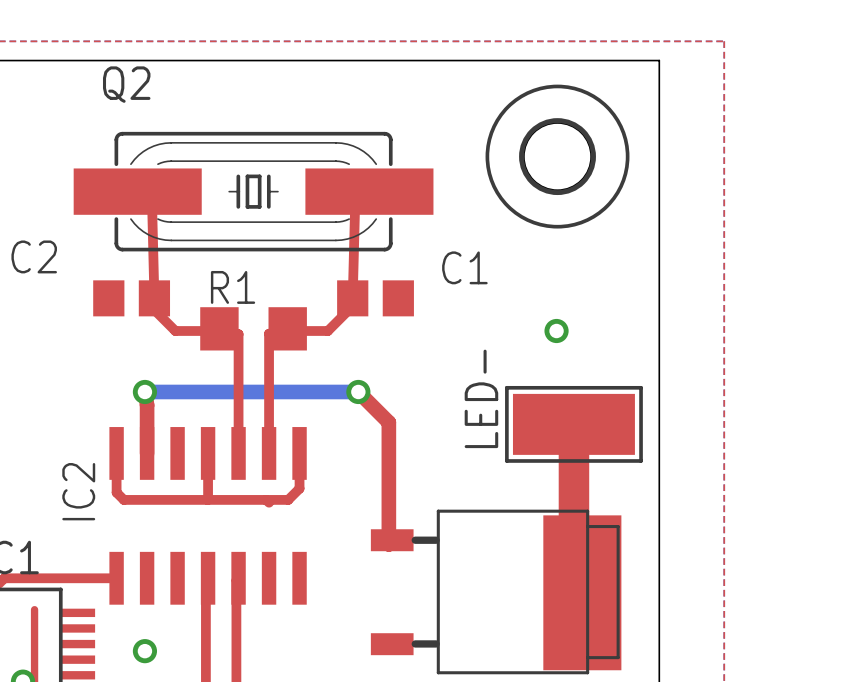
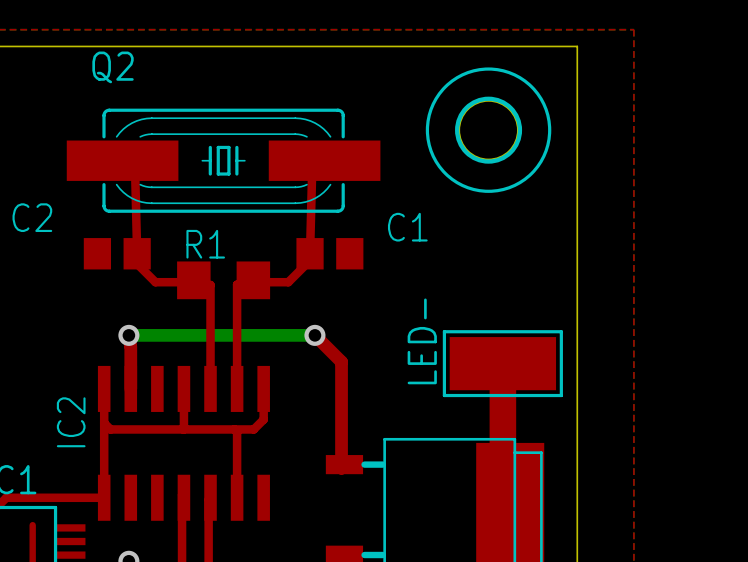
via: (556, 331) -> none
top track: none -> (104, 423) (104, 497)
top track: none -> (237, 431) (237, 497)

